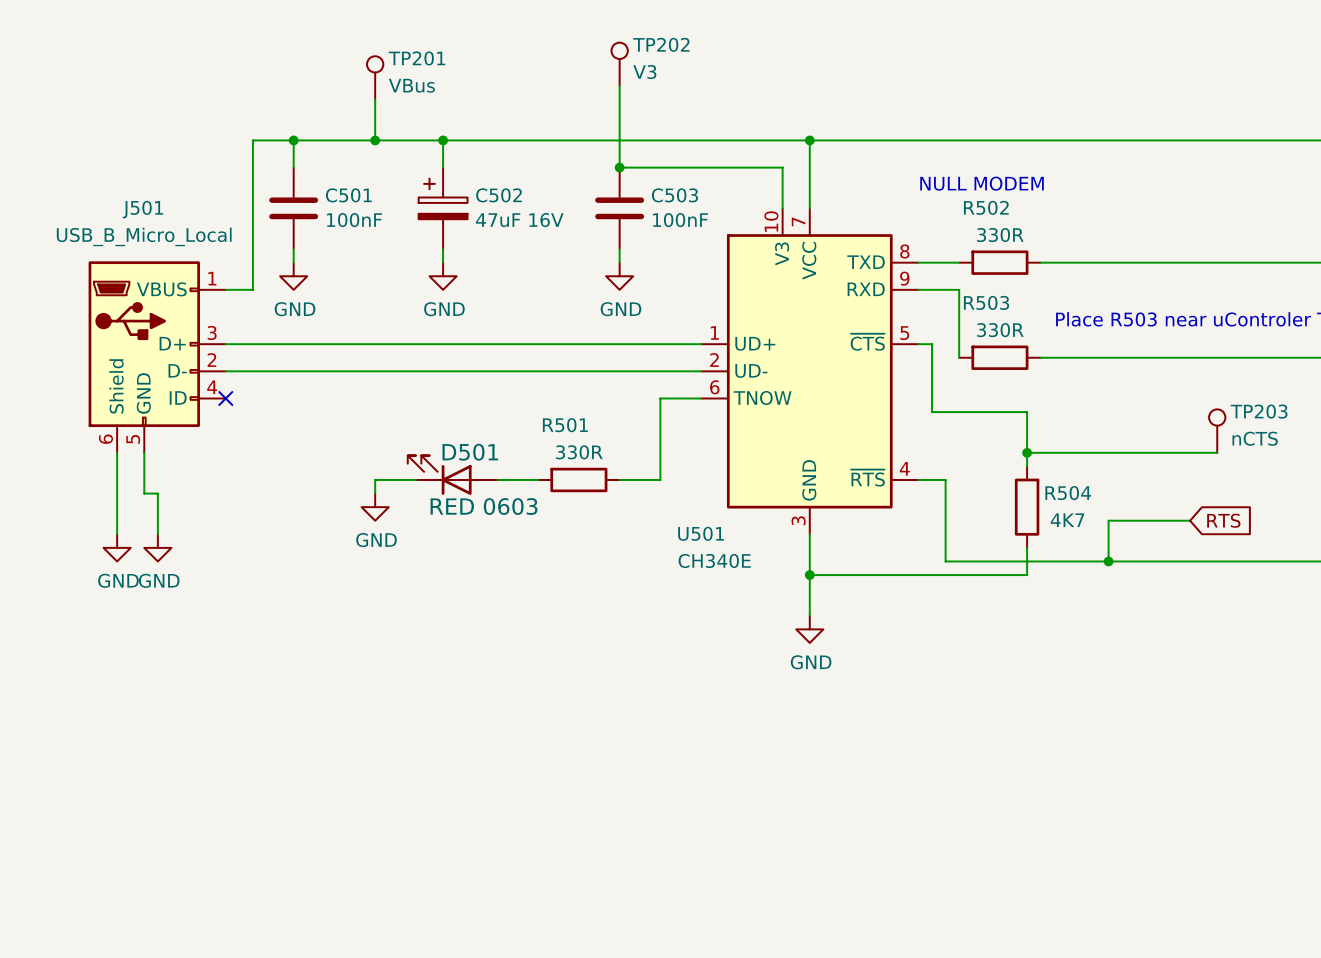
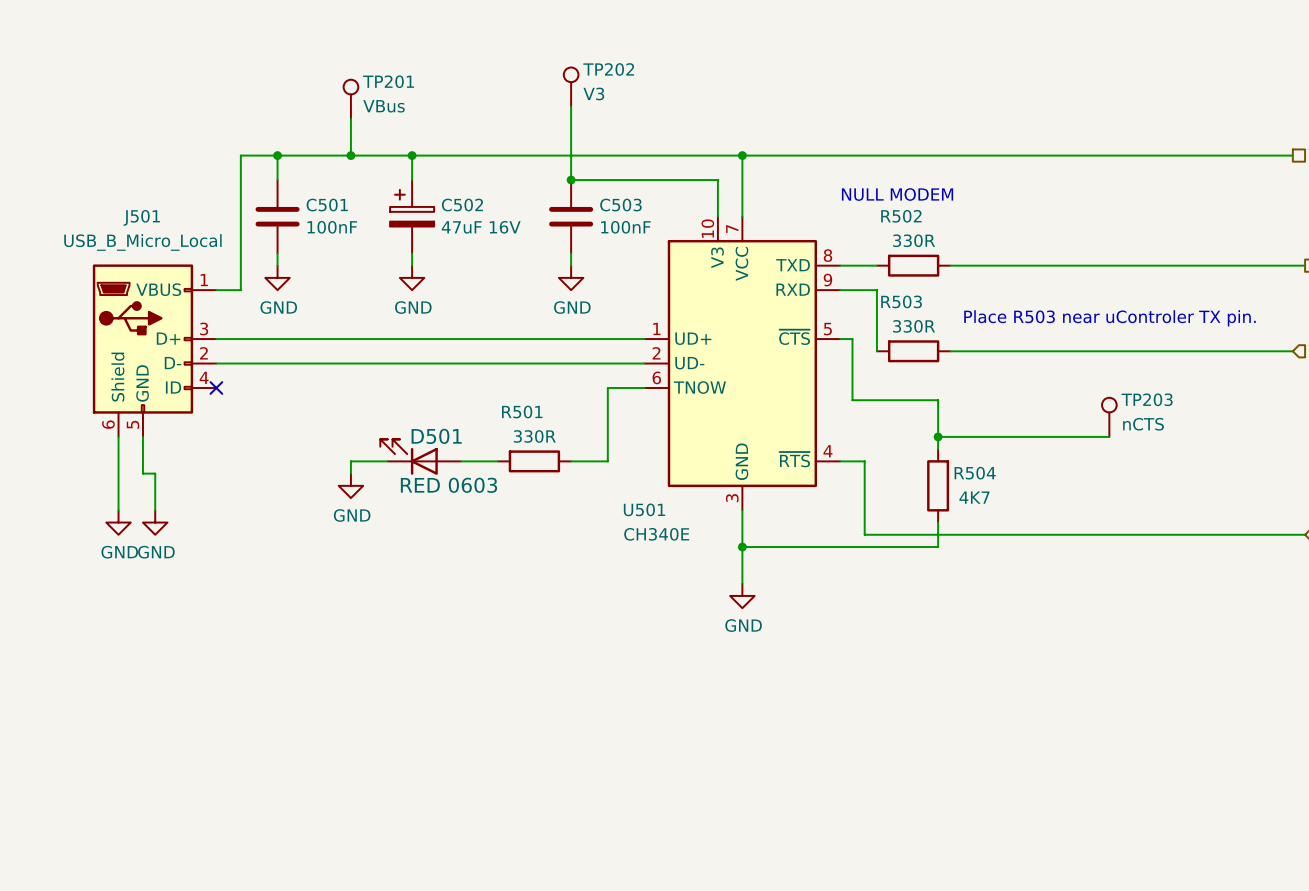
wire: (1190, 520) (1108, 520) (1108, 561) -> none
global label: RTS (1223, 520) -> none
junction: (1108, 561) -> none

